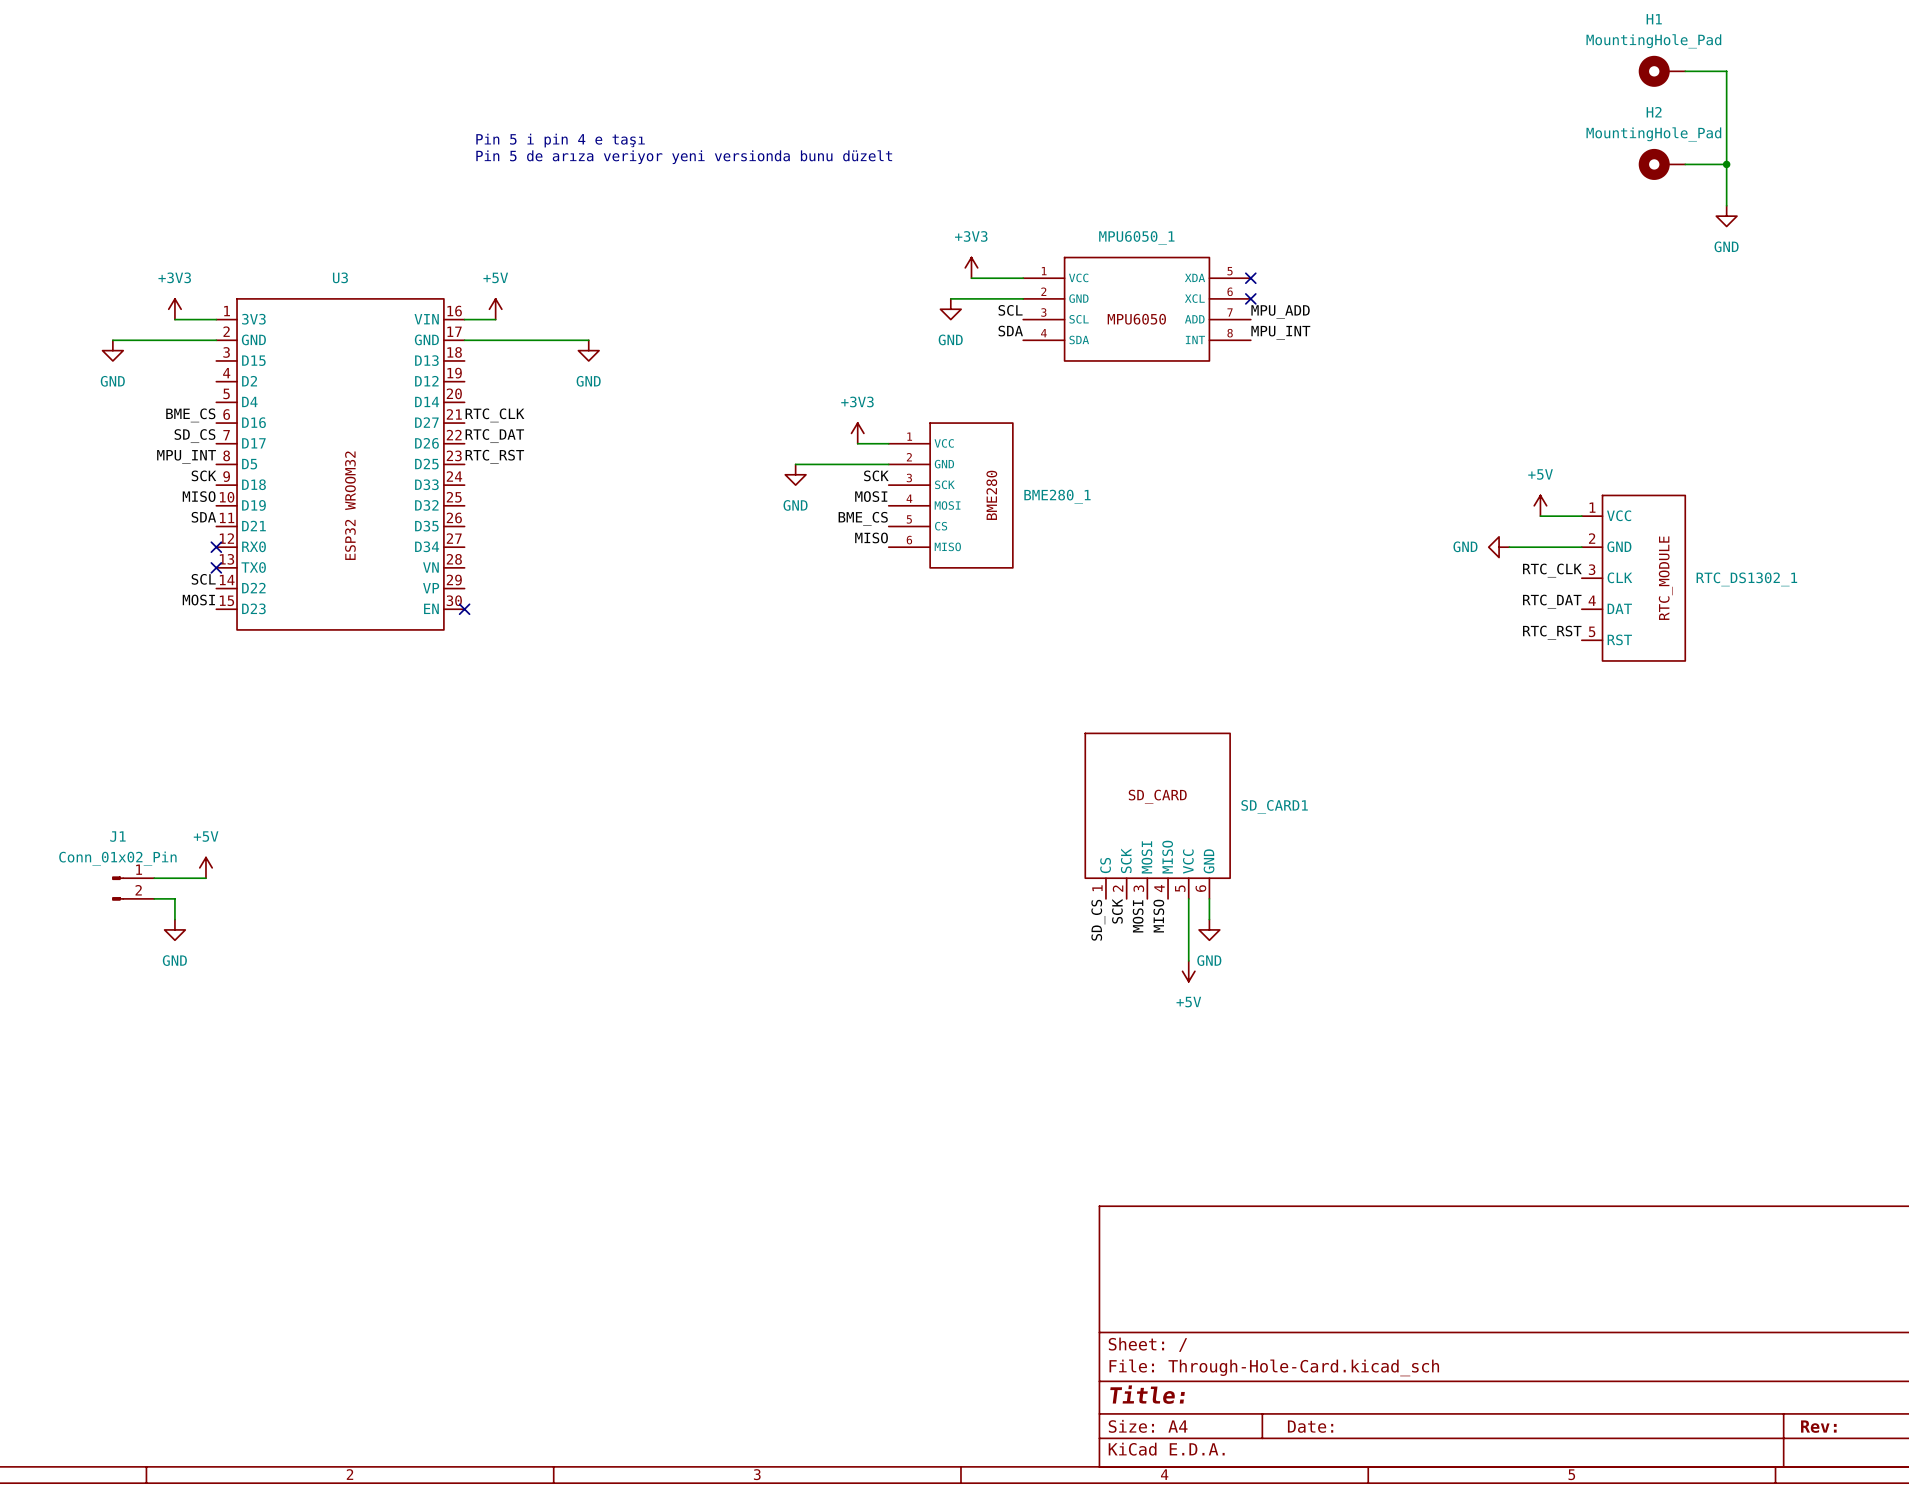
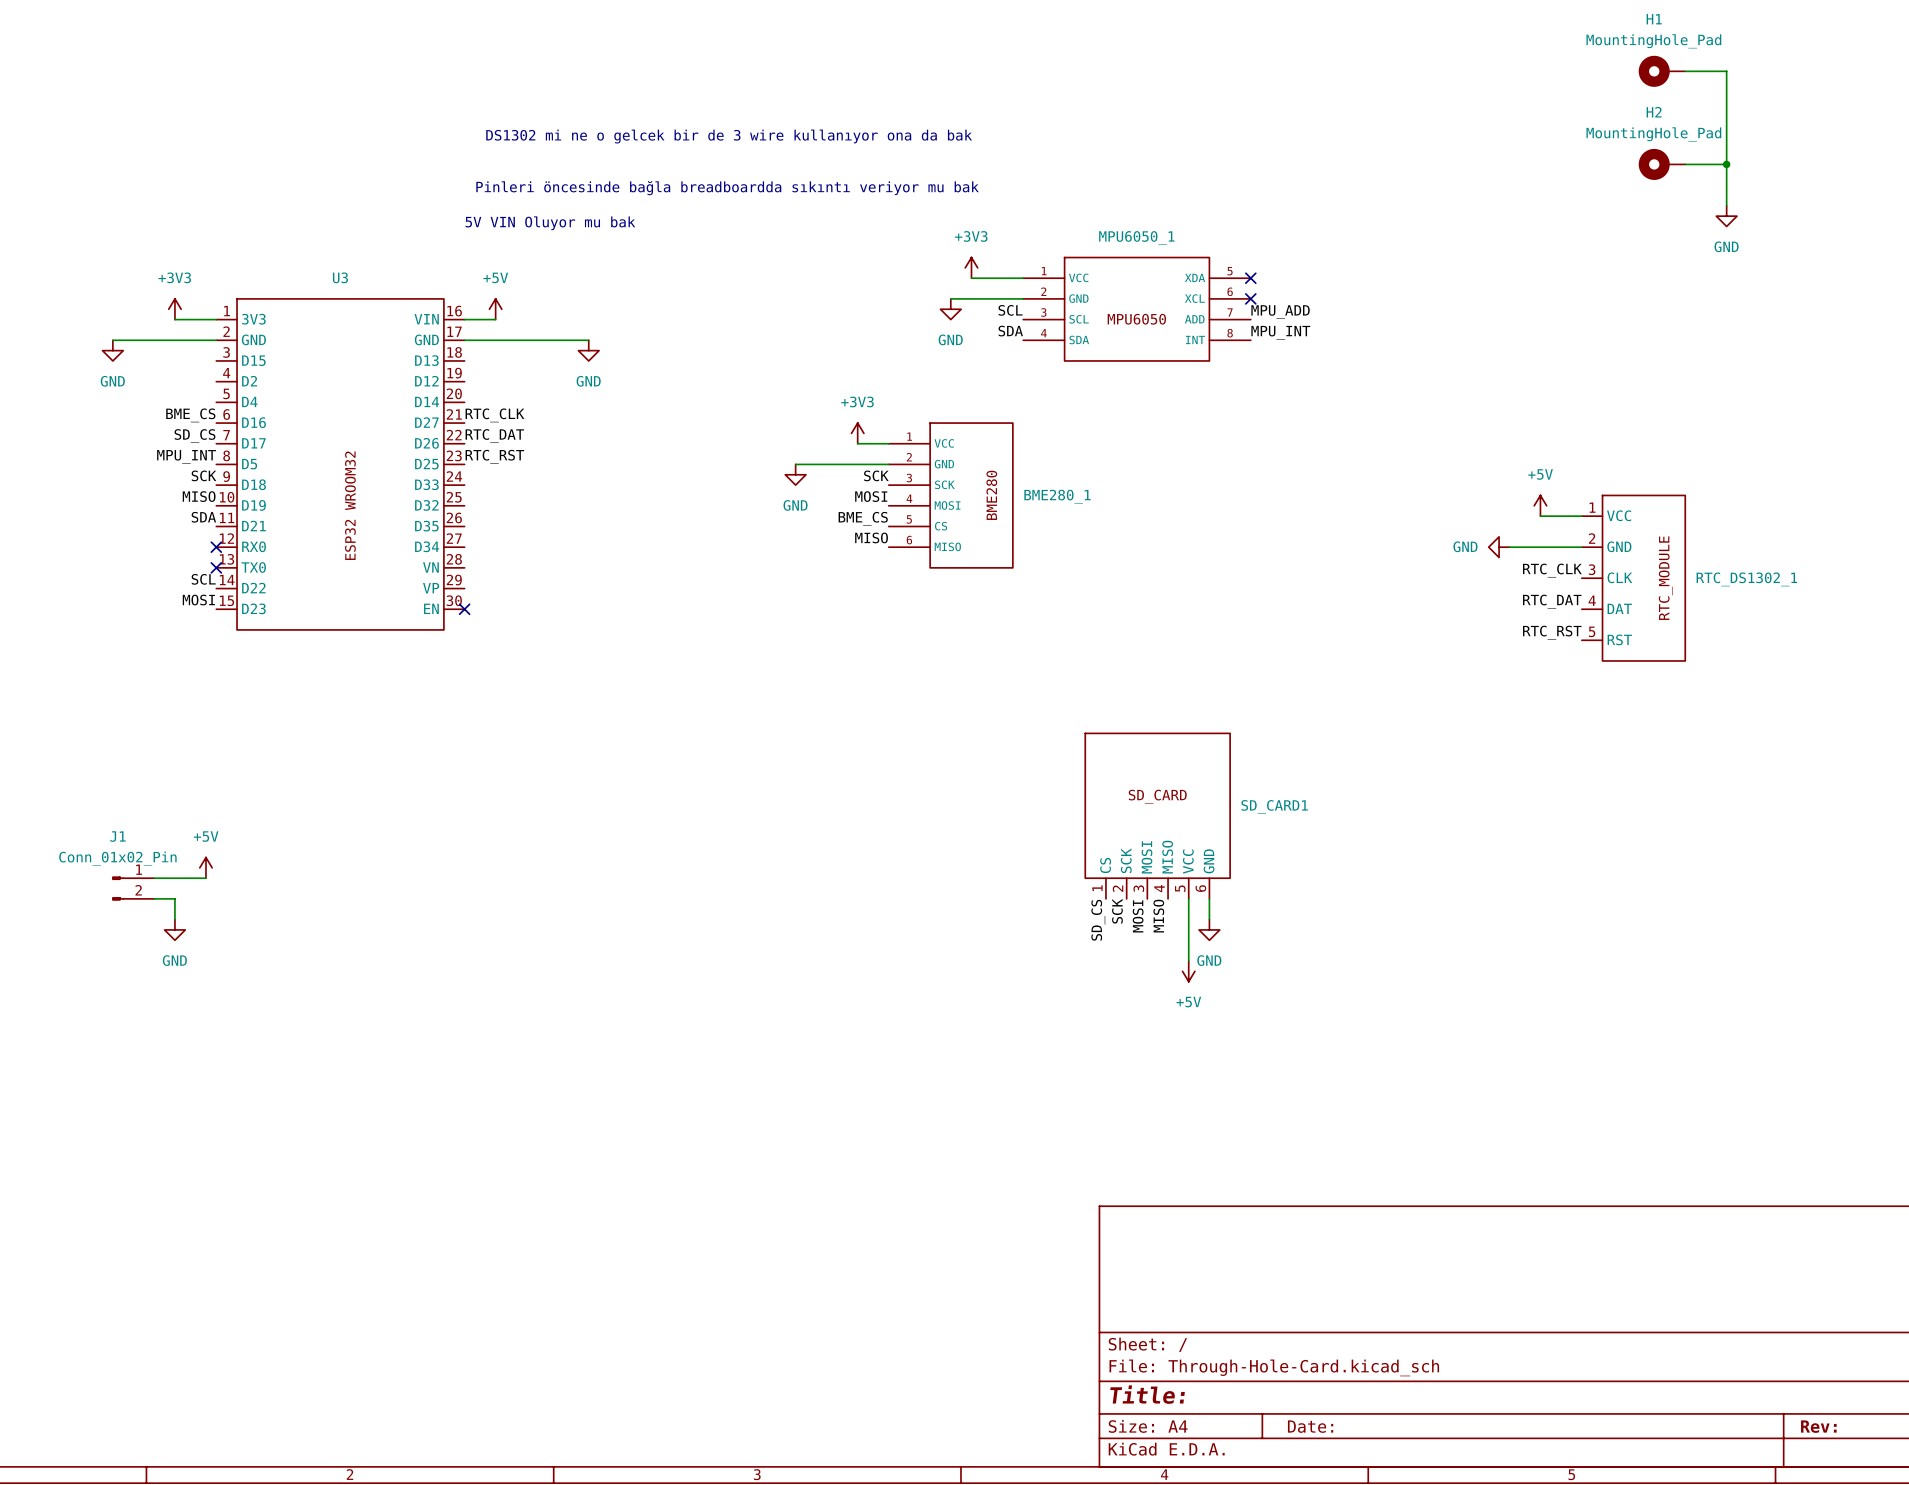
text: none -> DS1302 mi ne o gelcek bir de 3 wire kullanıyor ona da bak (729, 136)
text: Pin 5 i pin 4 e taşı (560, 140) -> none
text: Pin 5 de arıza veriyor yeni versionda bunu düzelt (684, 157) -> none
text: none -> Pinleri öncesinde bağla breadboardda sıkıntı veriyor mu bak (727, 188)
text: none -> 5V VIN Oluyor mu bak (550, 223)

